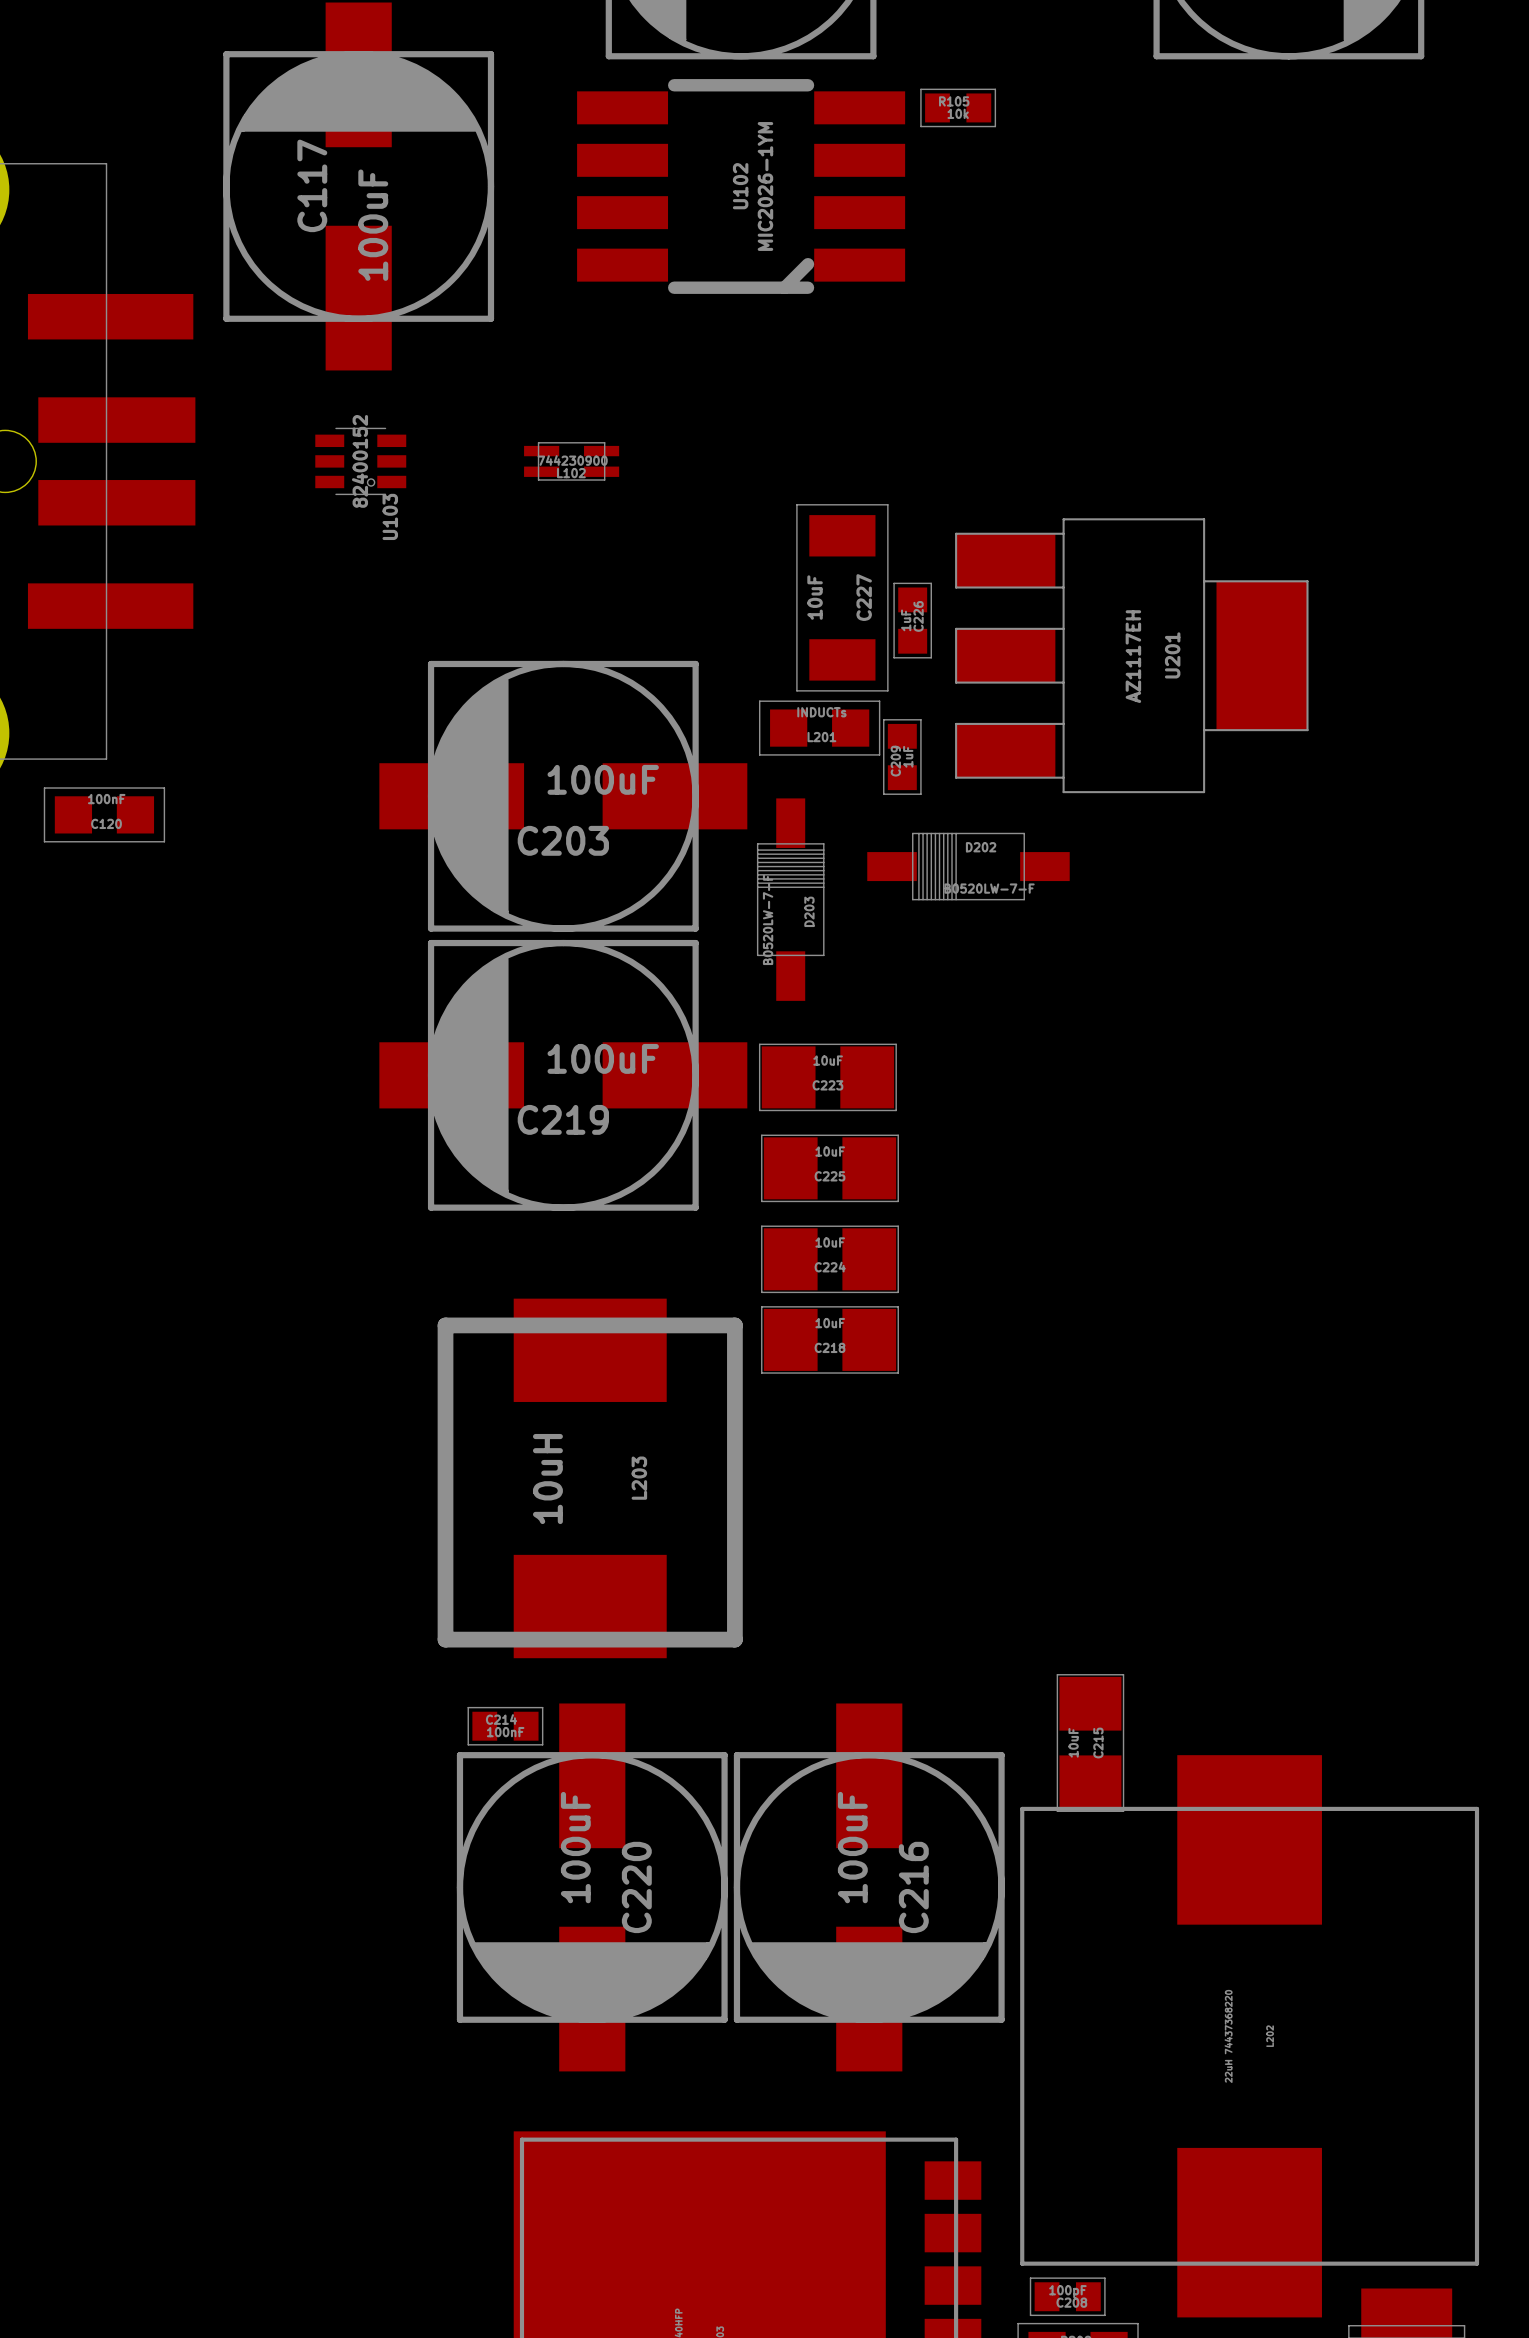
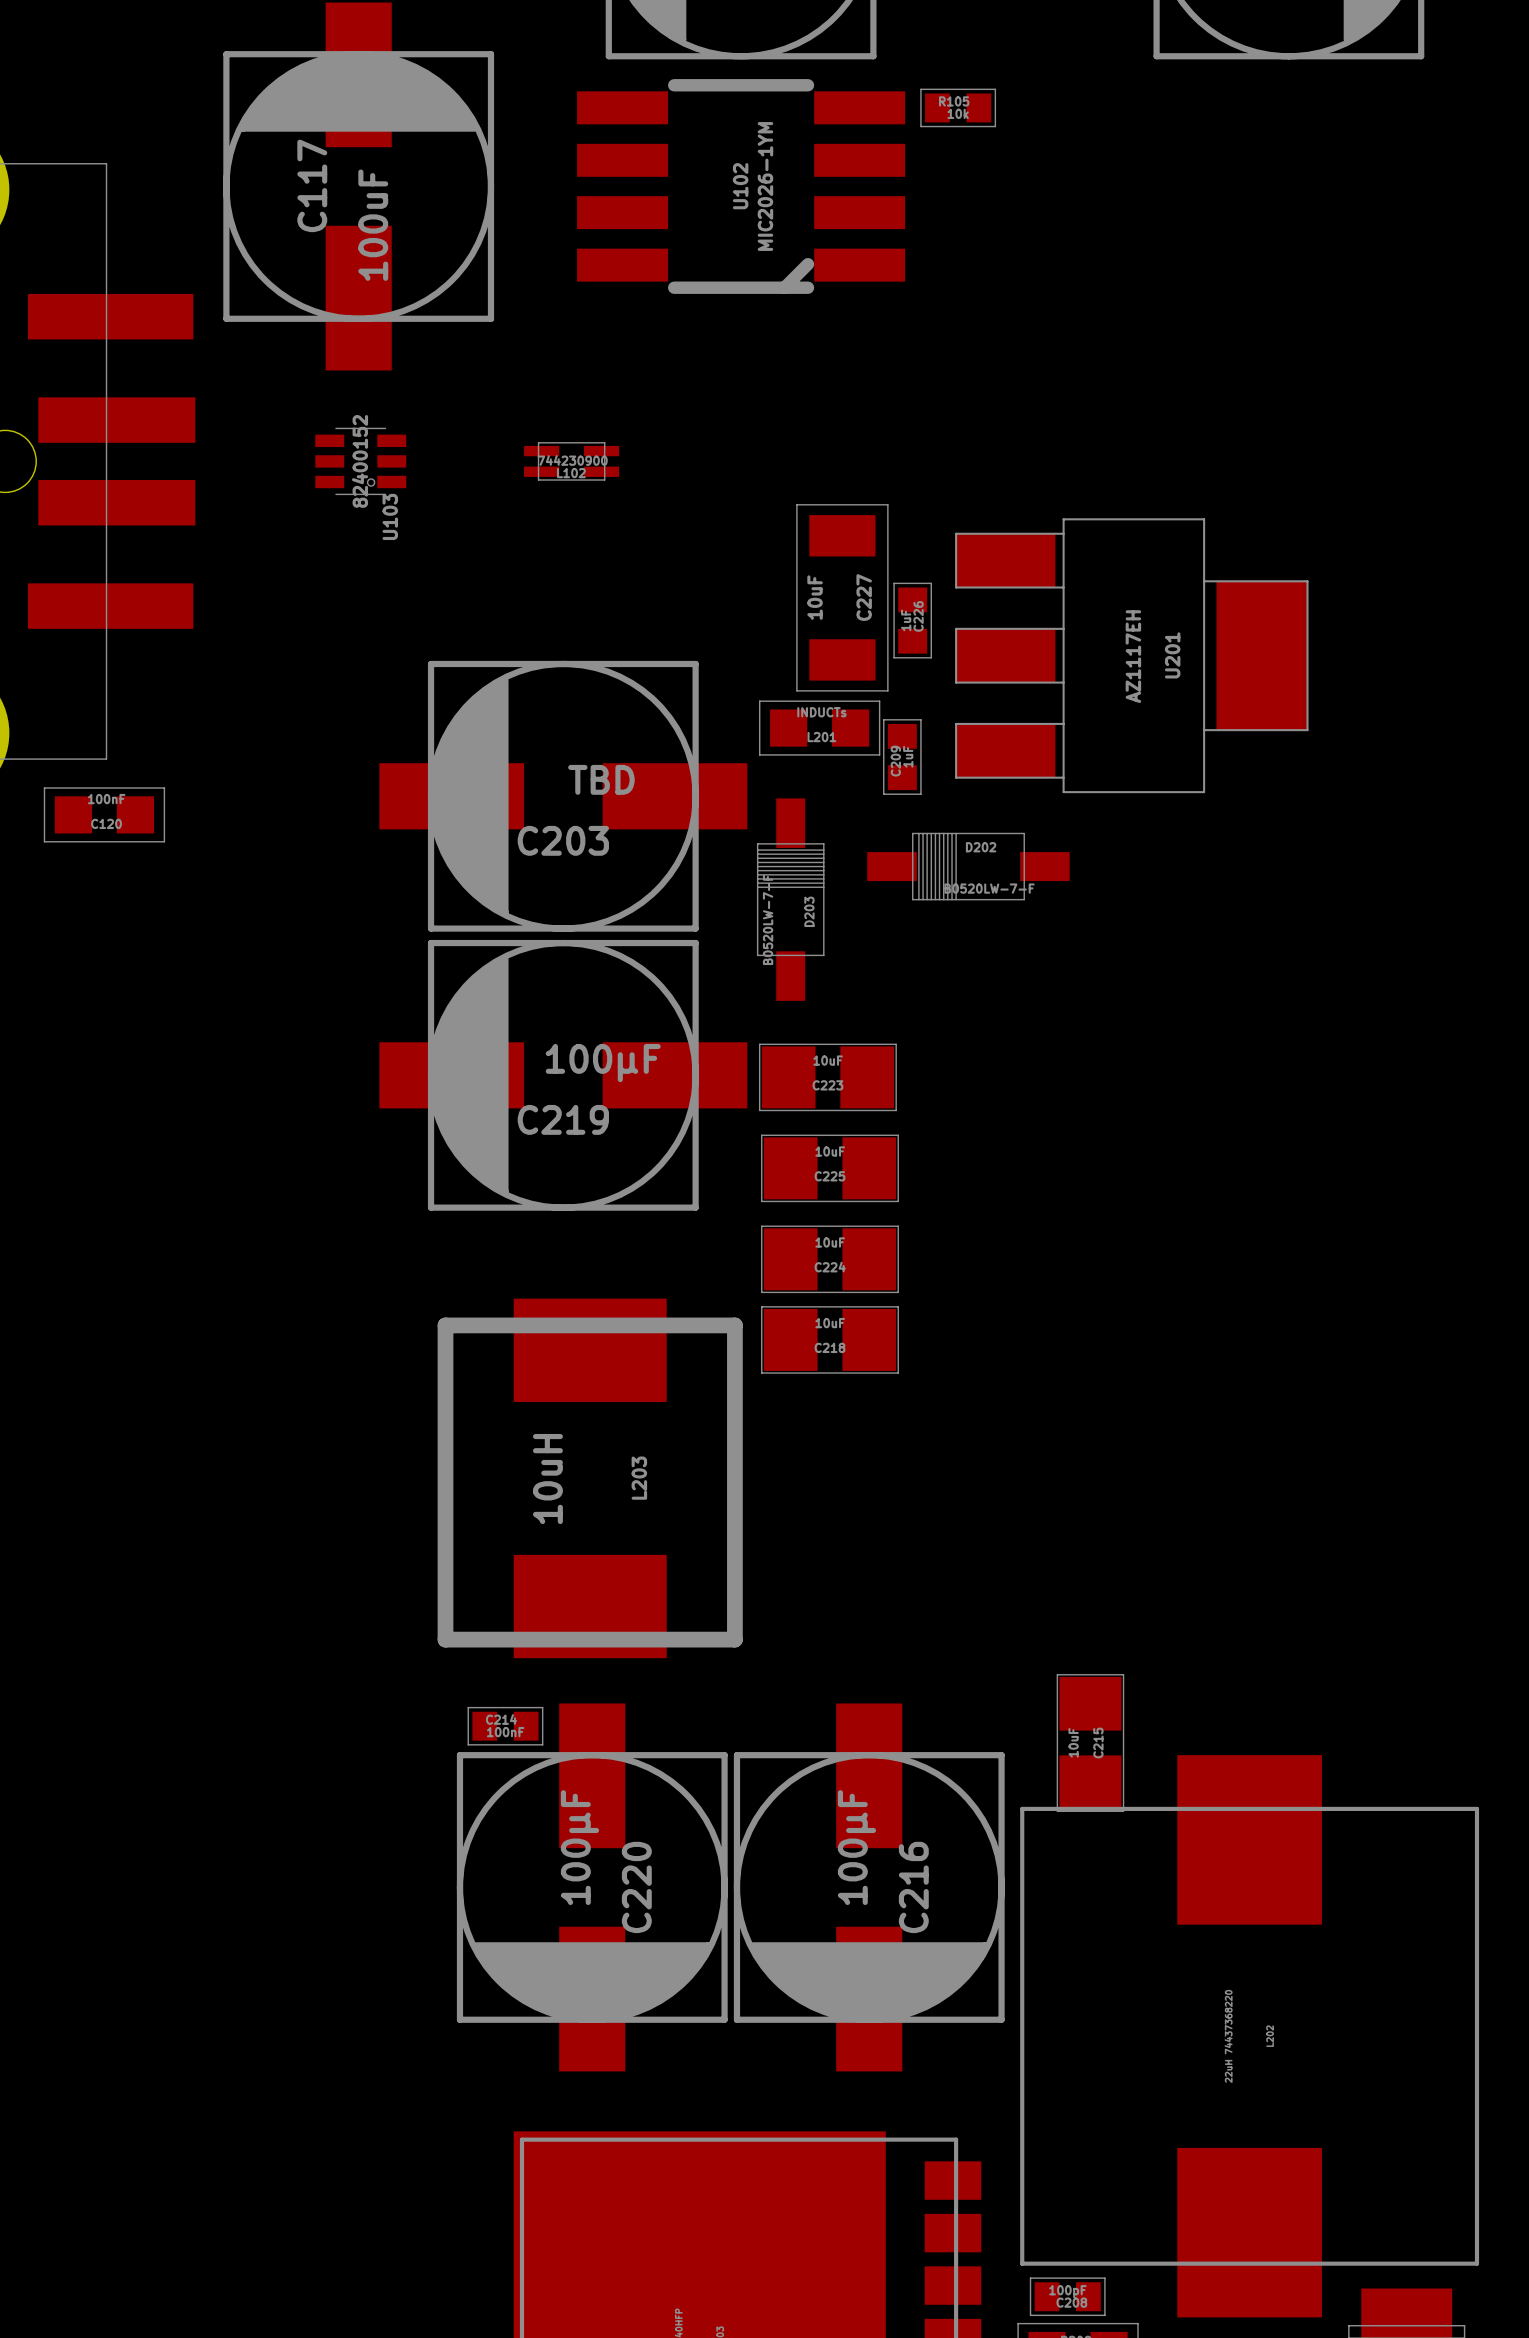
C203 value: 100uF (603, 779) -> TBD (601, 779)
C219 value: 100uF (603, 1058) -> 100µF (603, 1063)
C220 value: 100uF (575, 1847) -> 100µF (579, 1847)
C216 value: 100uF (852, 1847) -> 100µF (856, 1847)

